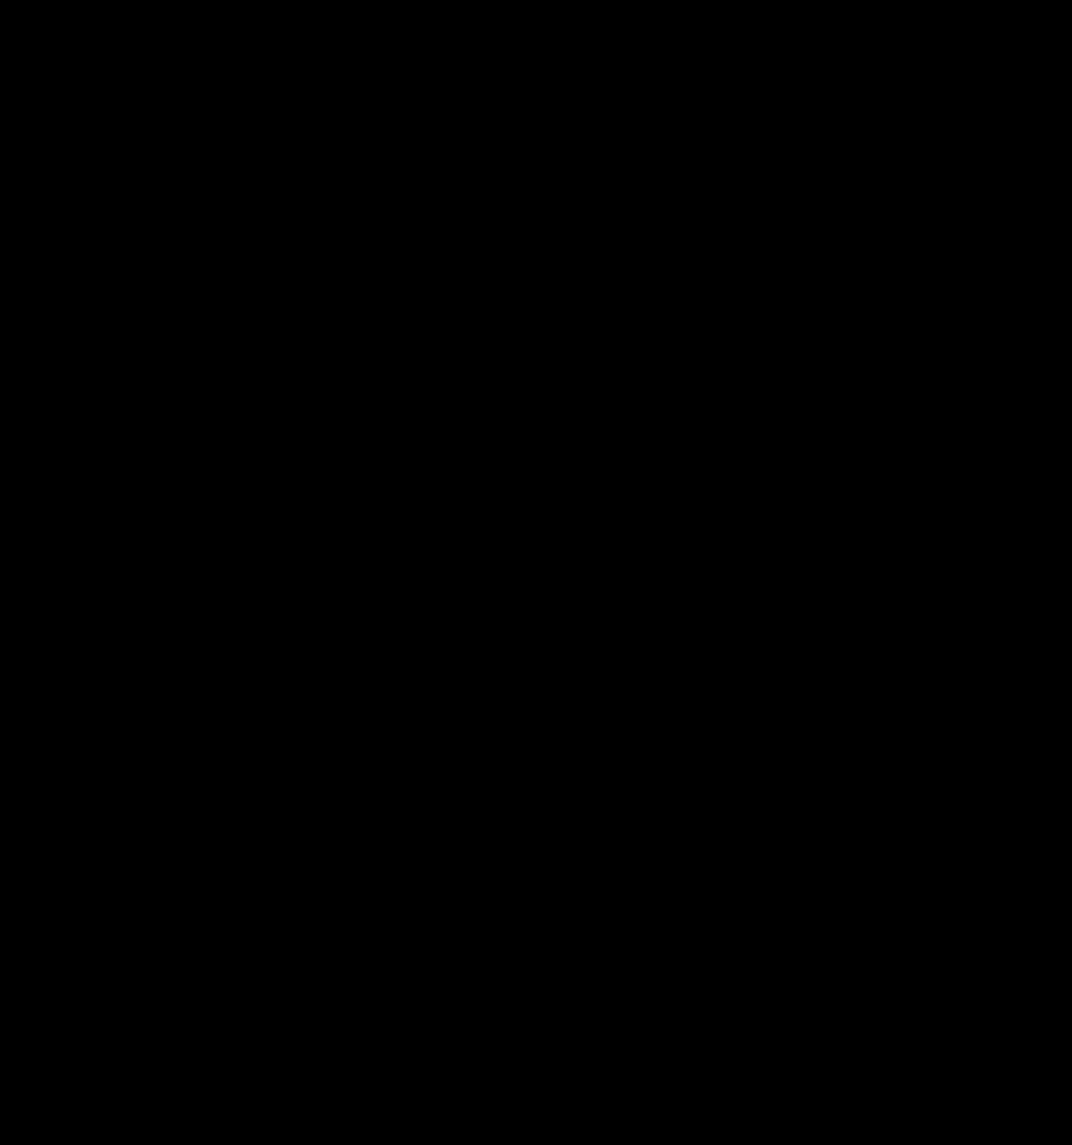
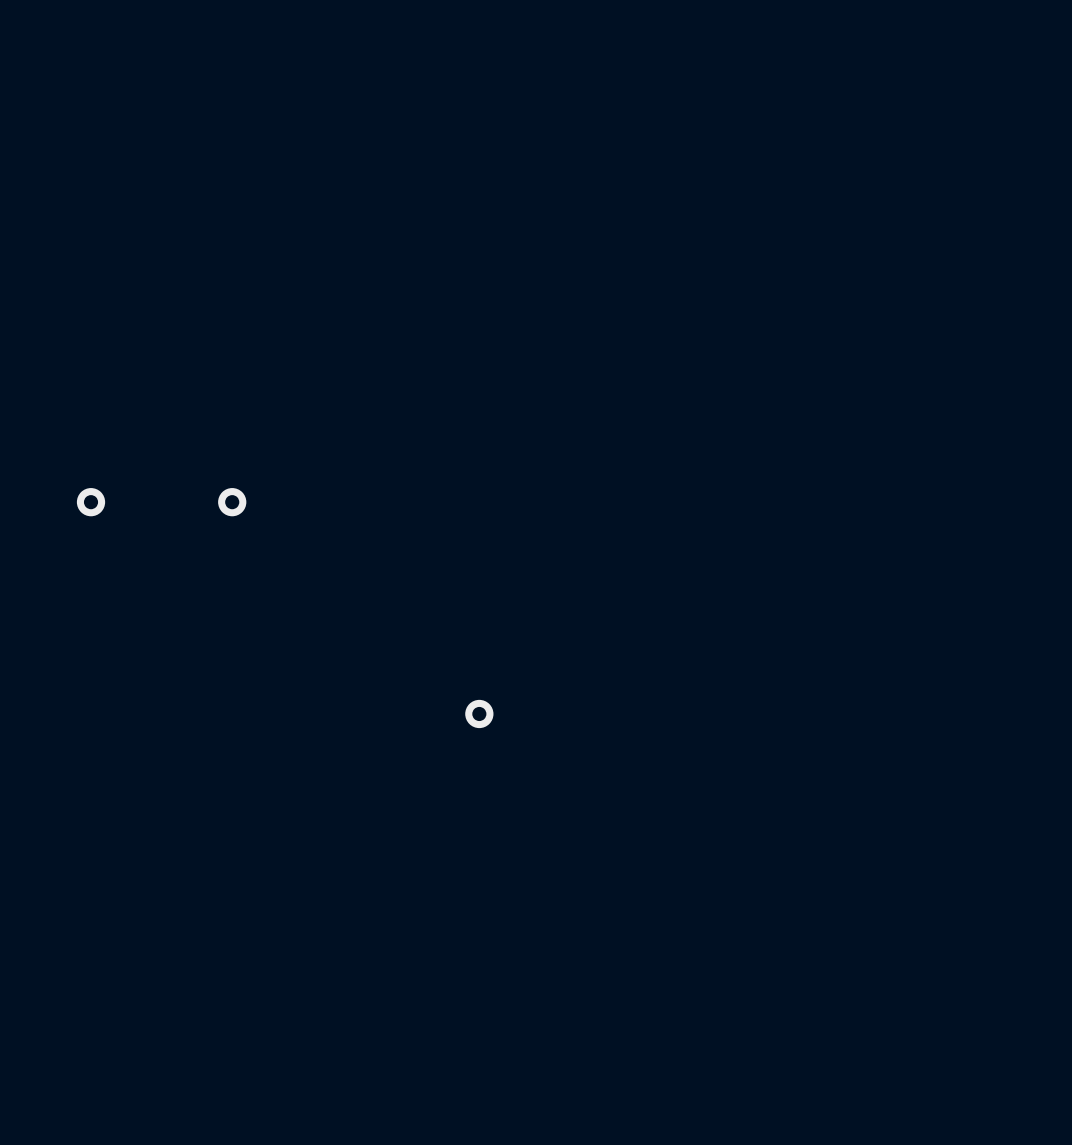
via: none -> (91, 502)
via: none -> (232, 502)
via: none -> (479, 713)

